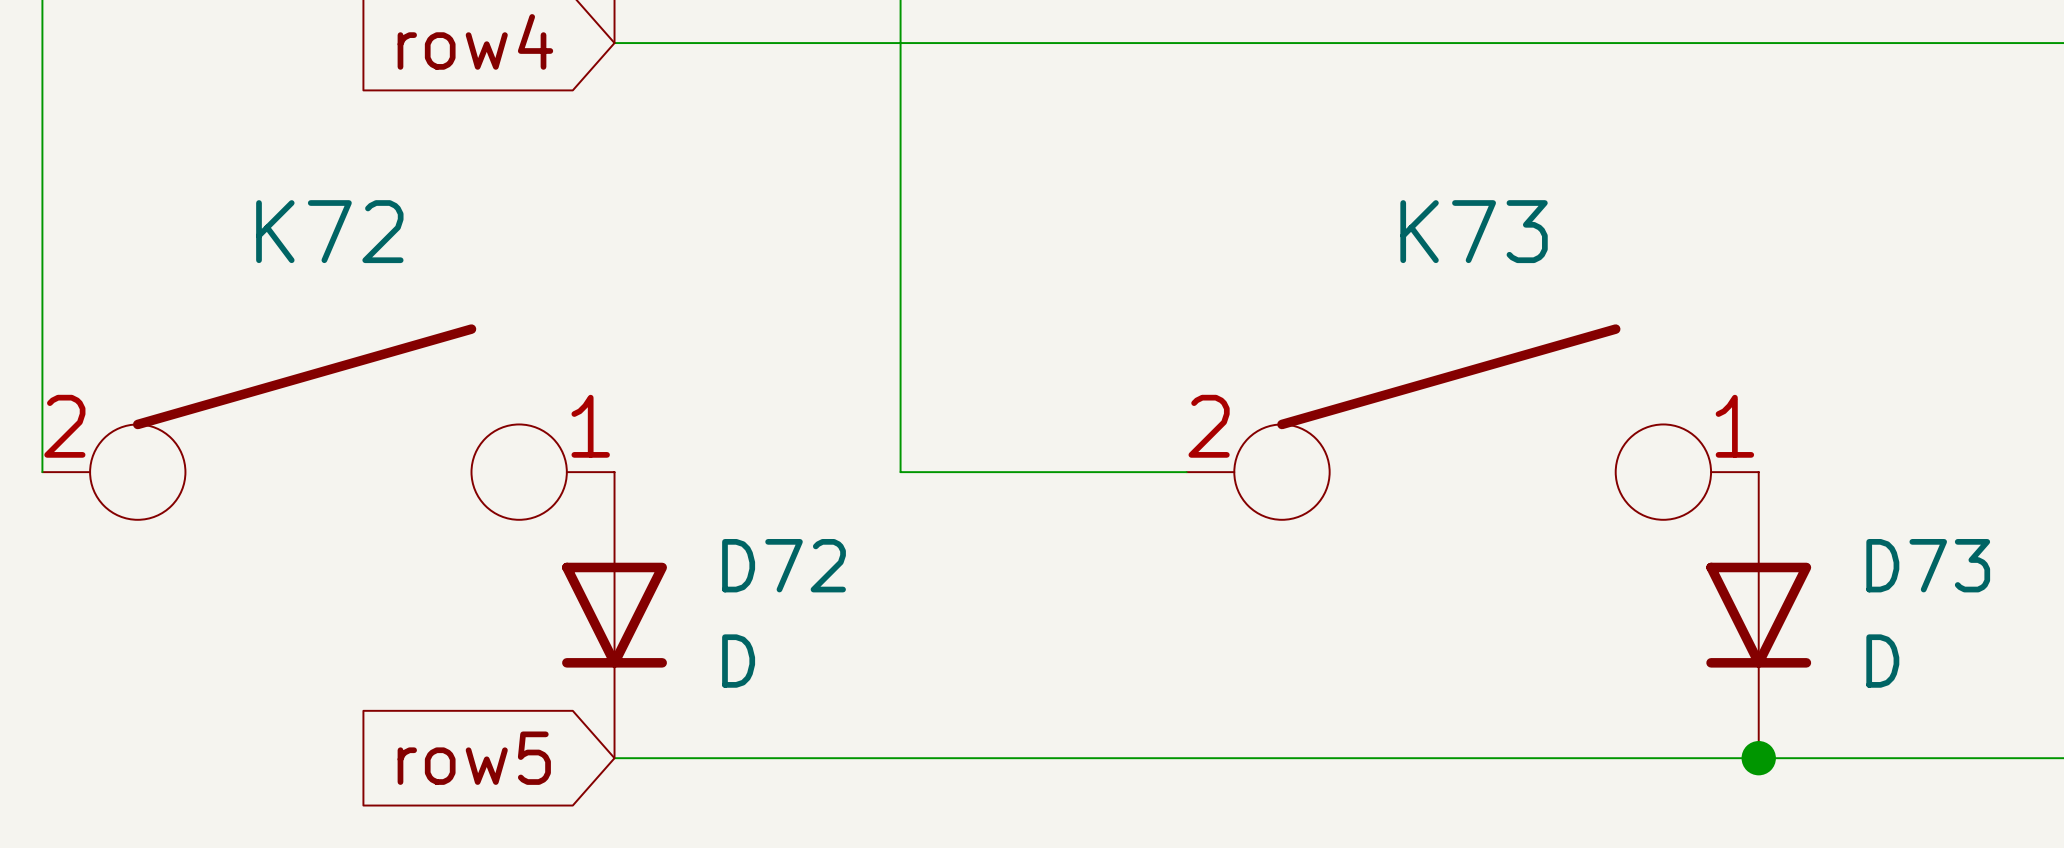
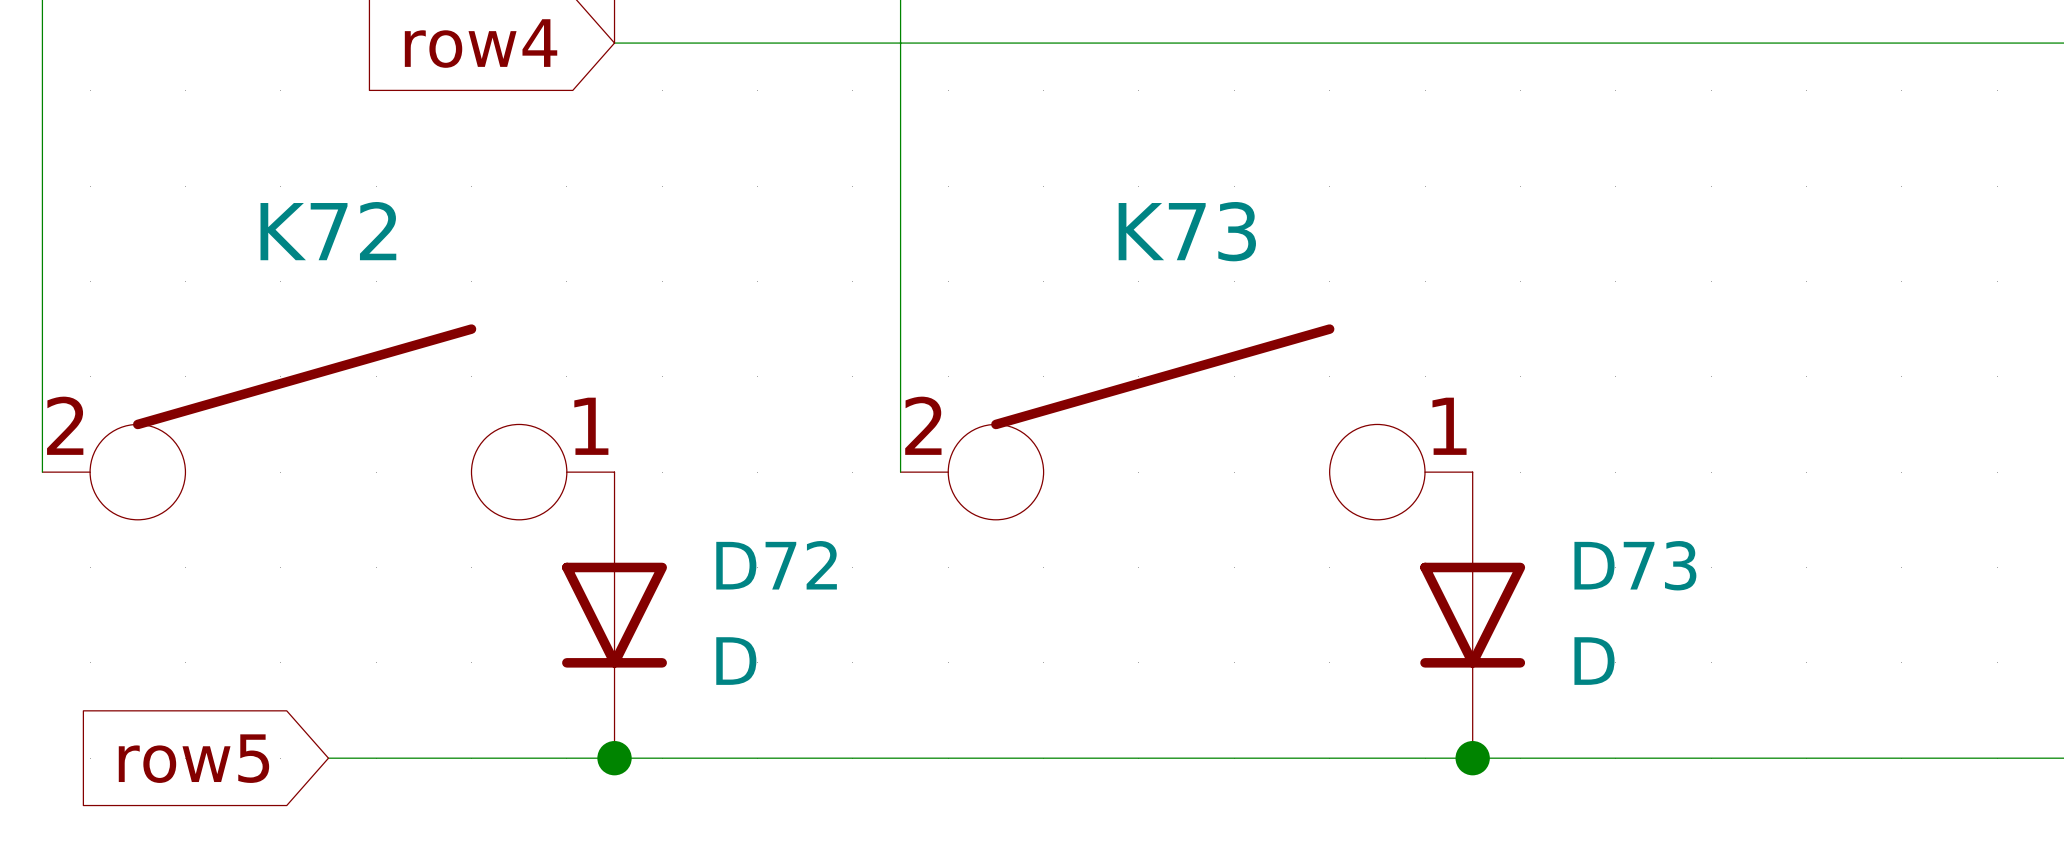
K73 position: (1472, 422) -> (1186, 422)
wire: (900, 472) (1186, 472) -> (328, 758) (614, 758)
D73 position: (1758, 615) -> (1472, 615)
global label position: row5 (474, 758) -> row5 (193, 758)
junction: none -> (614, 758)
junction: none -> (1472, 758)
junction: (1758, 758) -> none

